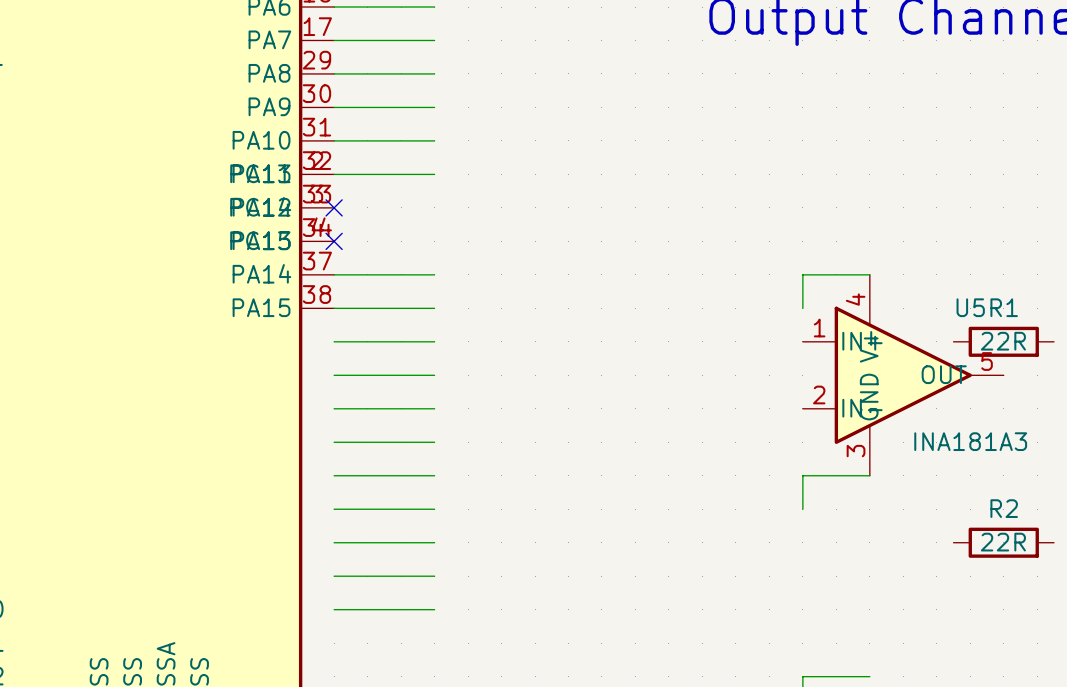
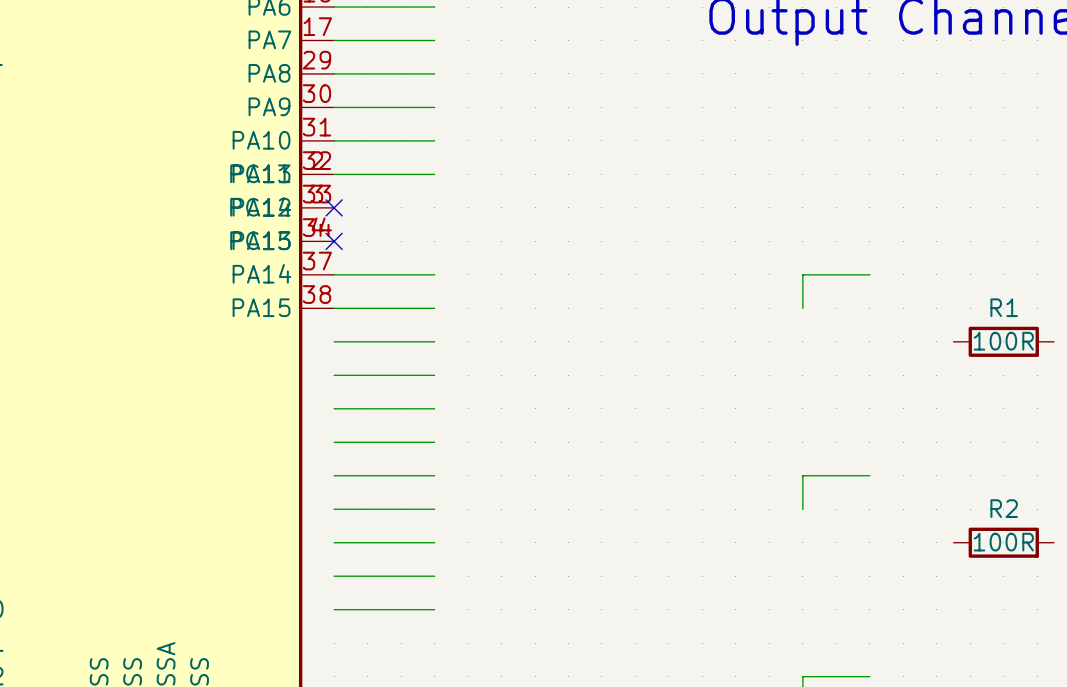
R1 value: 22R (1003, 341) -> 100R (1003, 341)
U5: INA181A3 (903, 375) -> none
R2 value: 22R (1003, 542) -> 100R (1003, 542)

